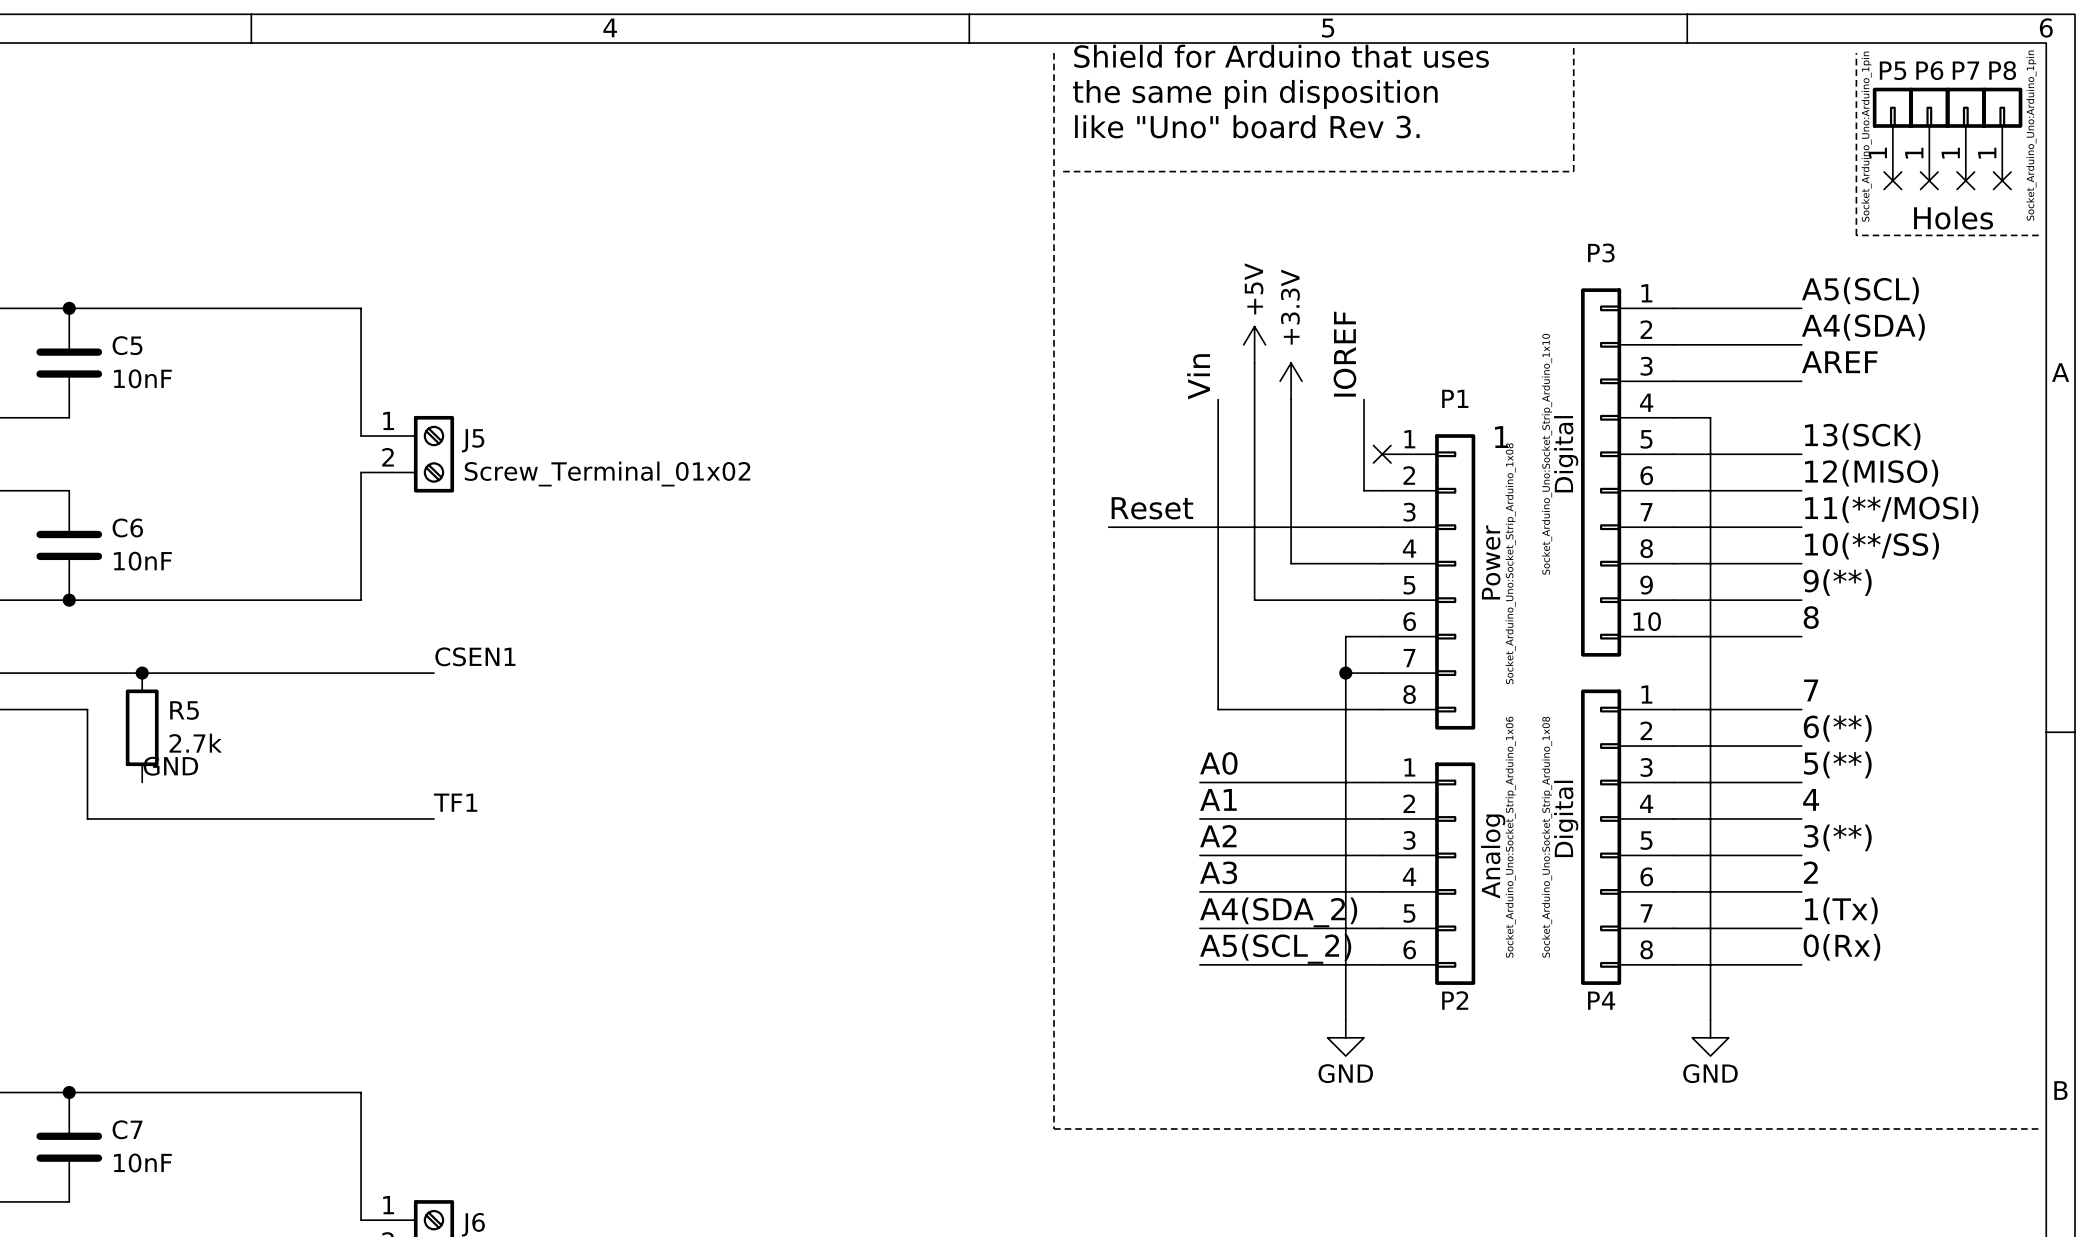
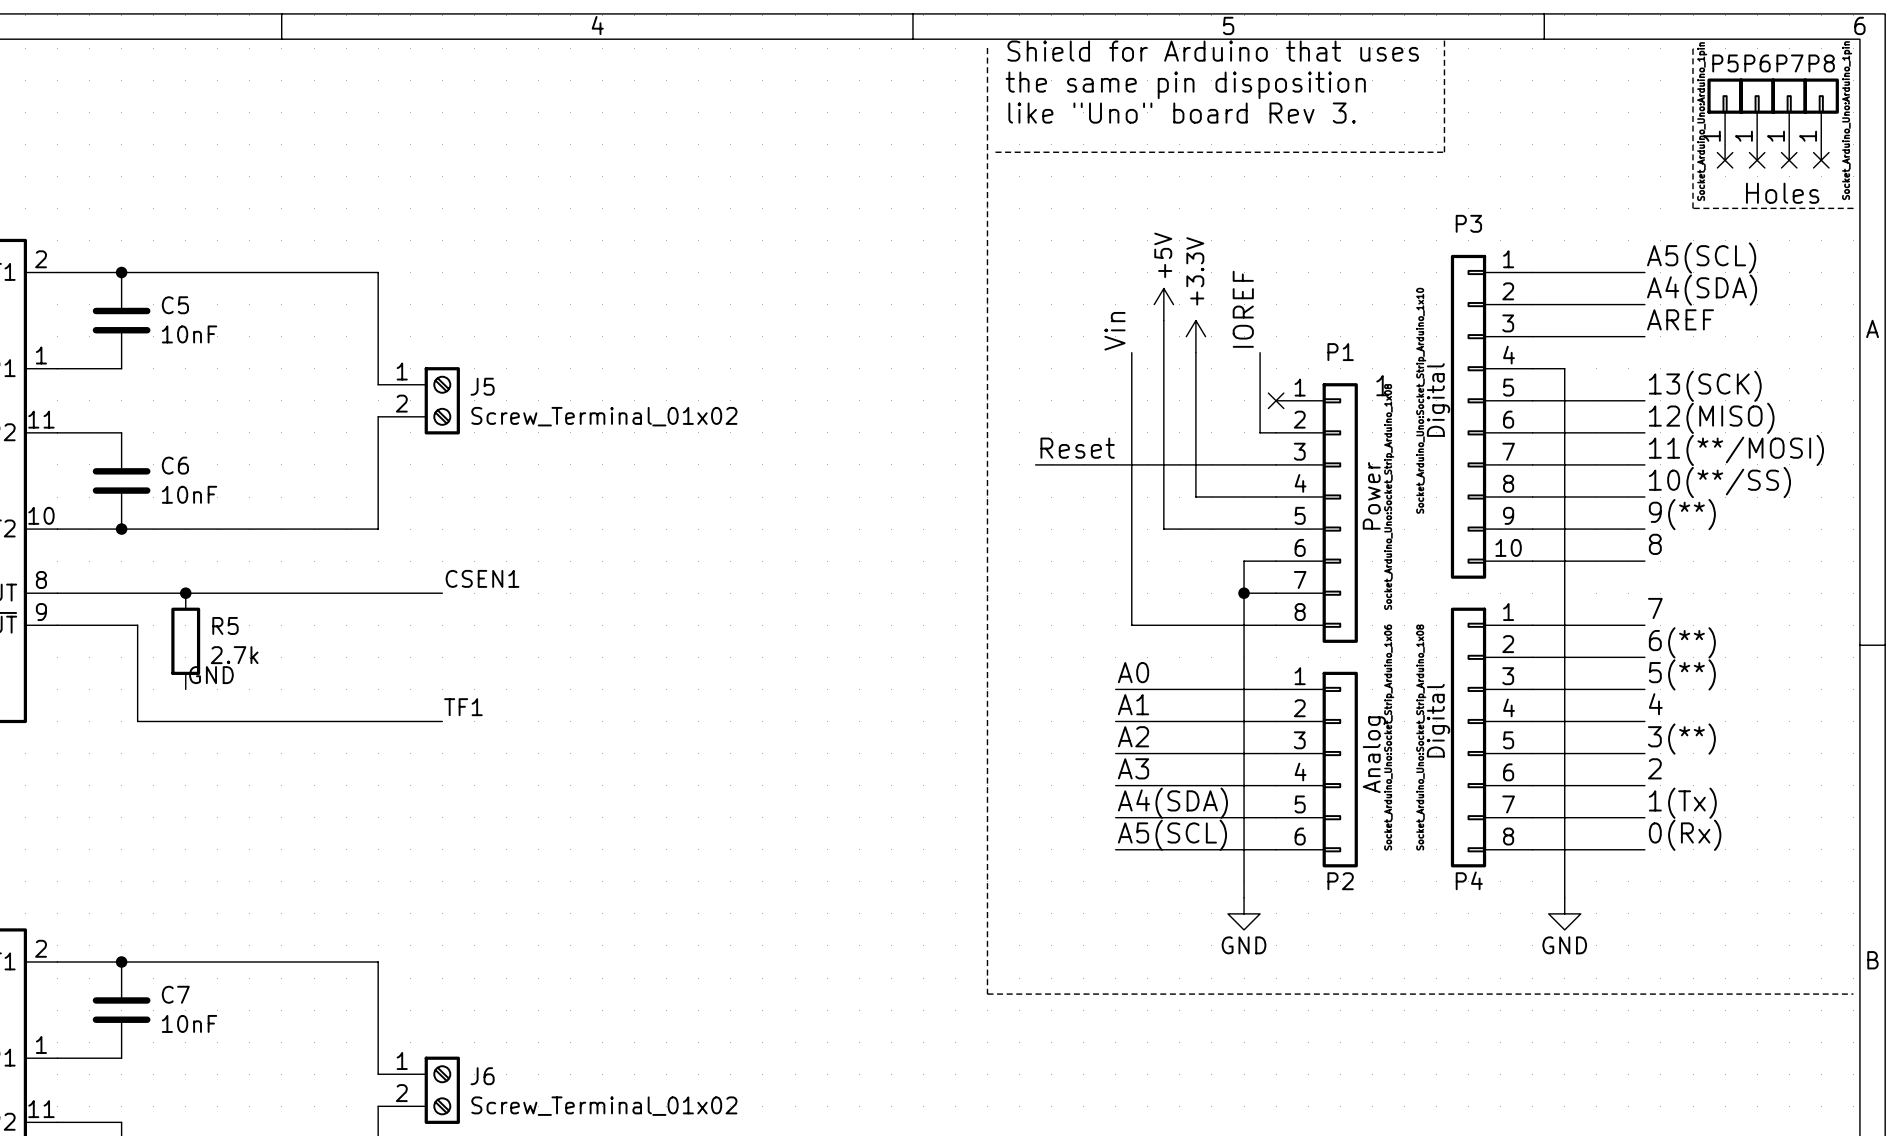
label: A4(SDA_2) (1278, 912) -> A4(SDA) (1172, 803)
label: A5(SCL_2) (1275, 948) -> A5(SCL) (1172, 835)

